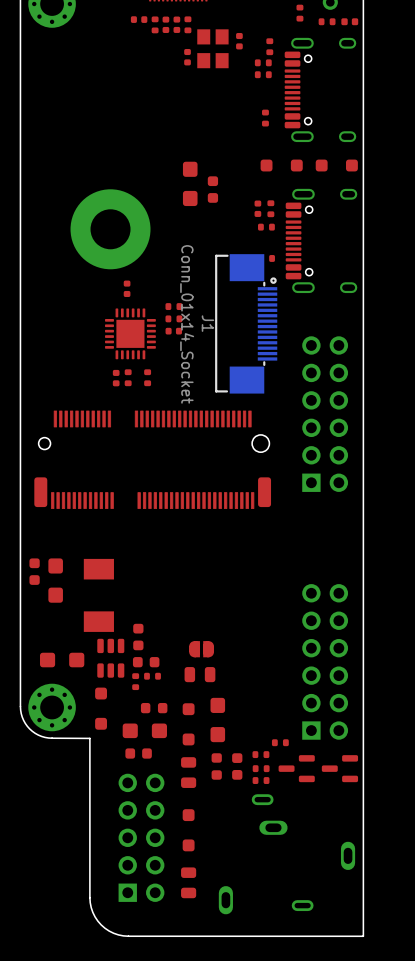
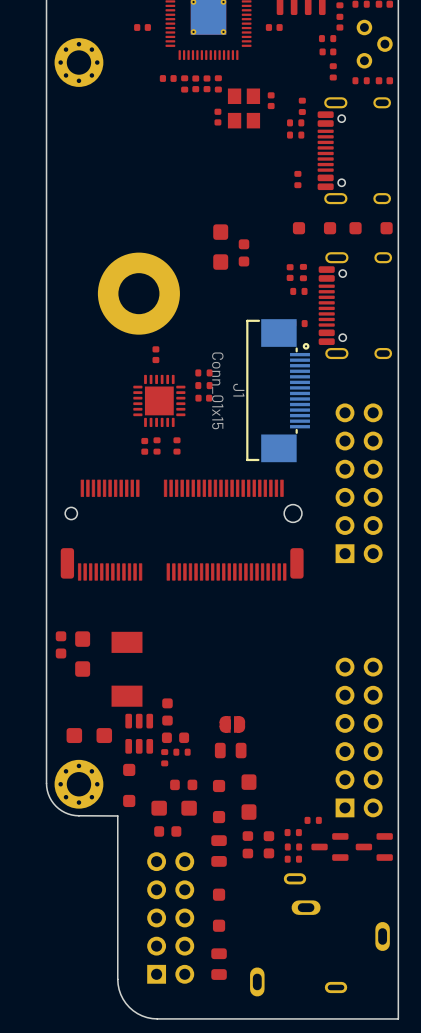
J1 value: Conn_01x14_Socket (187, 324) -> Conn_01x15 (217, 390)

